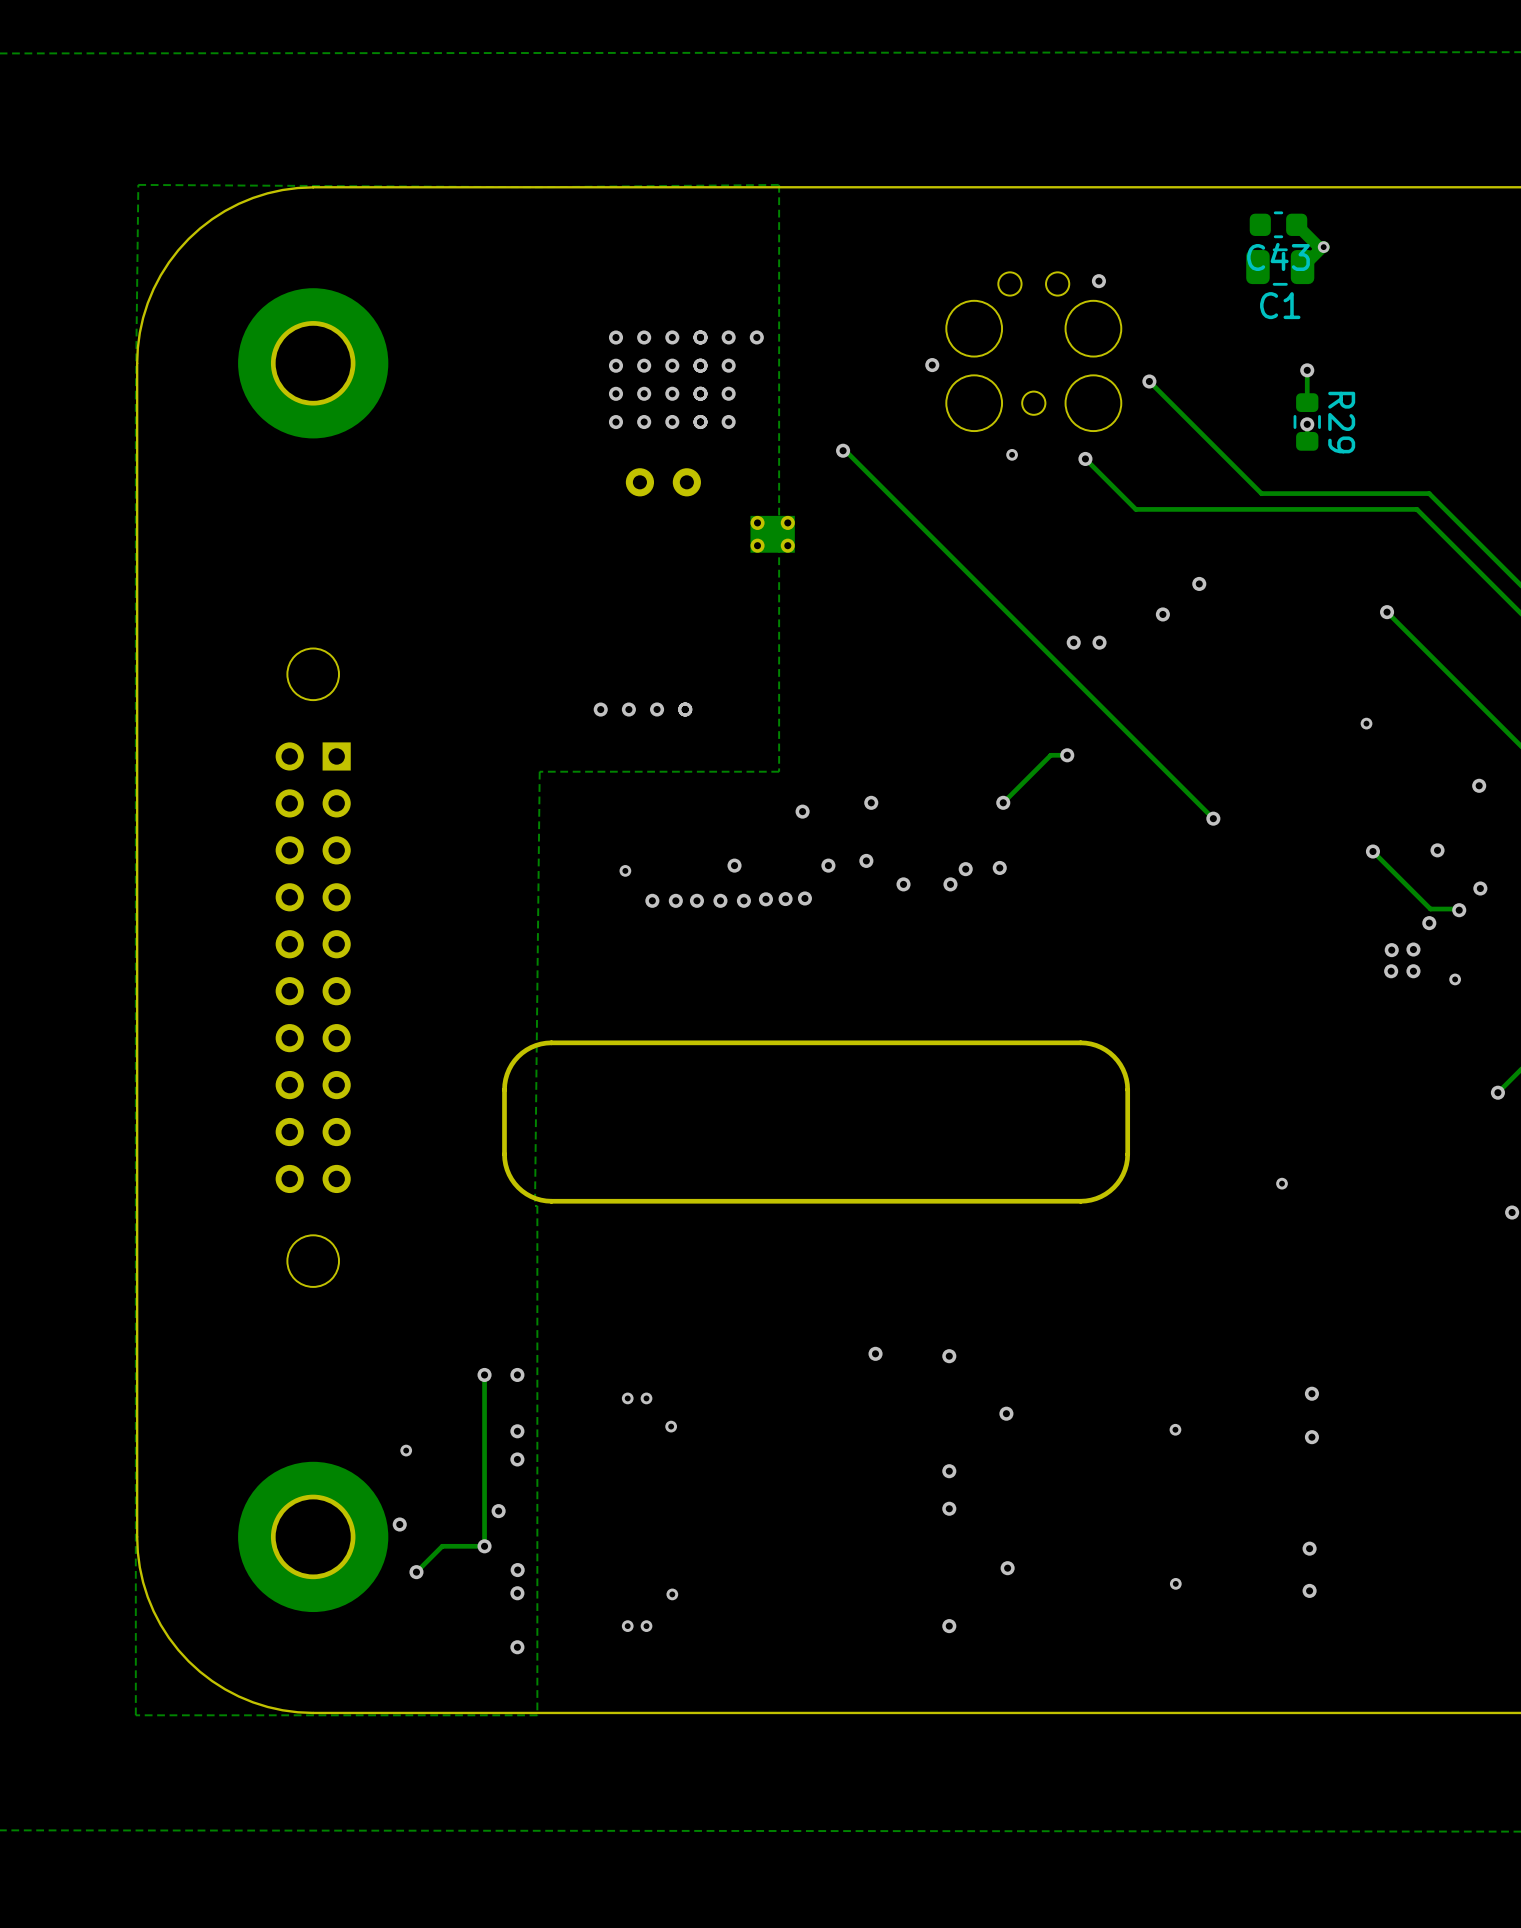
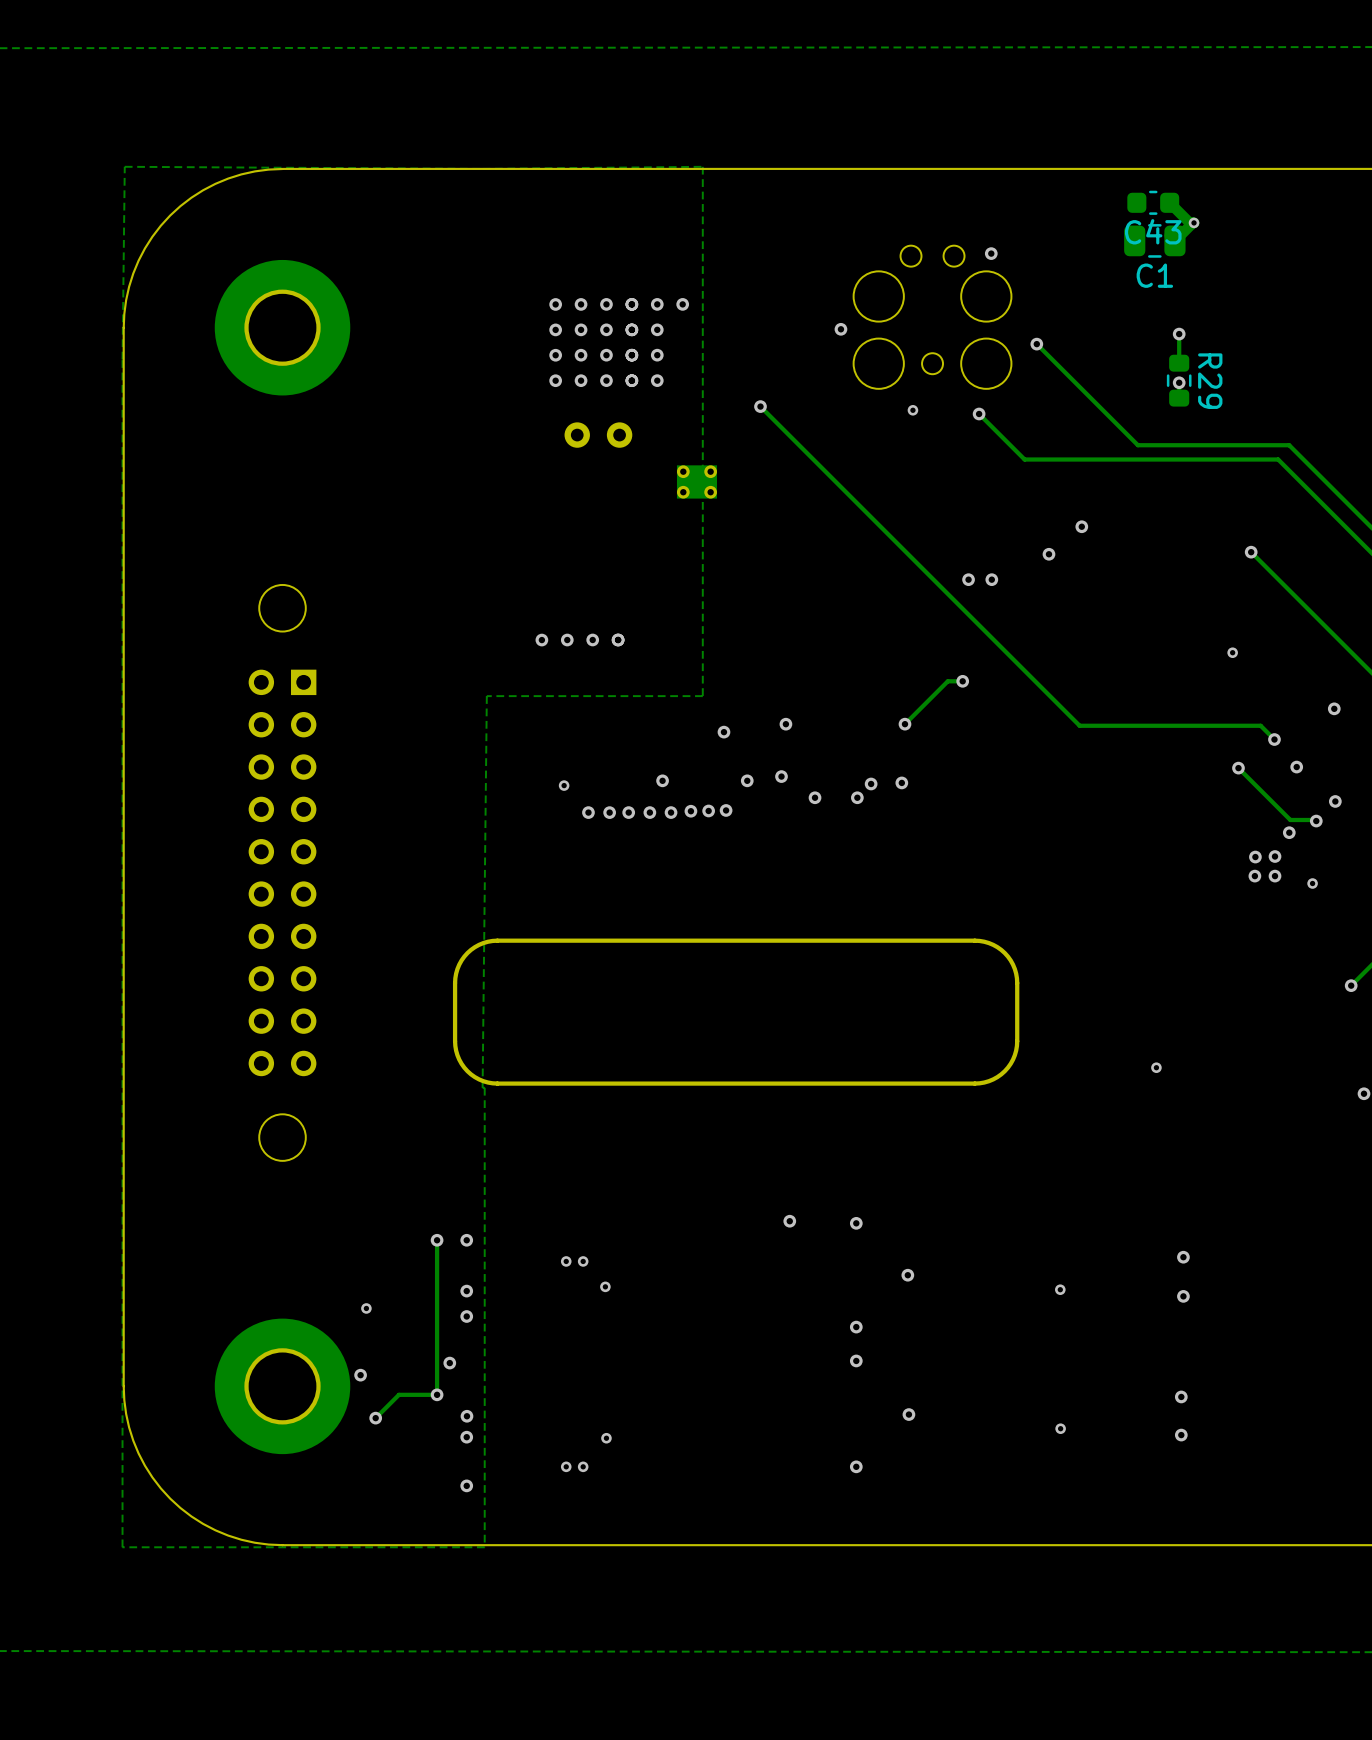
track: (843, 450) (845, 450) (1213, 818) -> (760, 406) (1079, 725) (1260, 725) (1274, 739)
via: (1213, 818) -> none
via: none -> (1274, 739)

